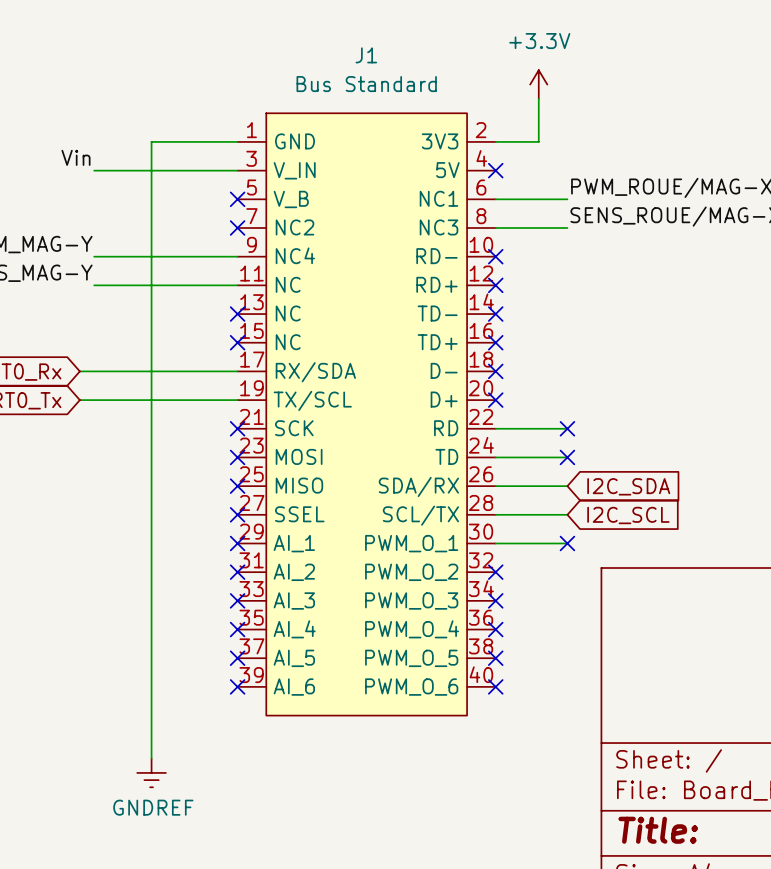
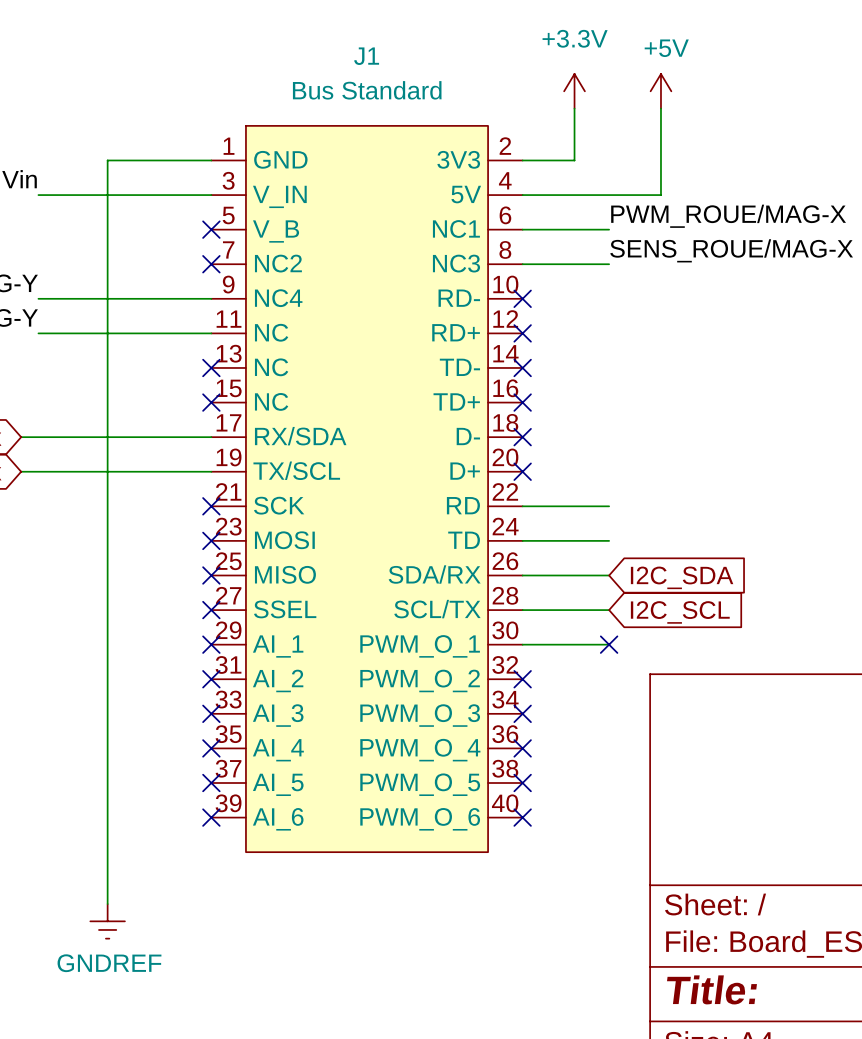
power symbol: none -> +5V (660, 91)
wire: none -> (660, 108) (660, 195) (522, 195)
no-connect mark: (495, 170) -> none
no-connect mark: (567, 428) -> none
no-connect mark: (567, 457) -> none

